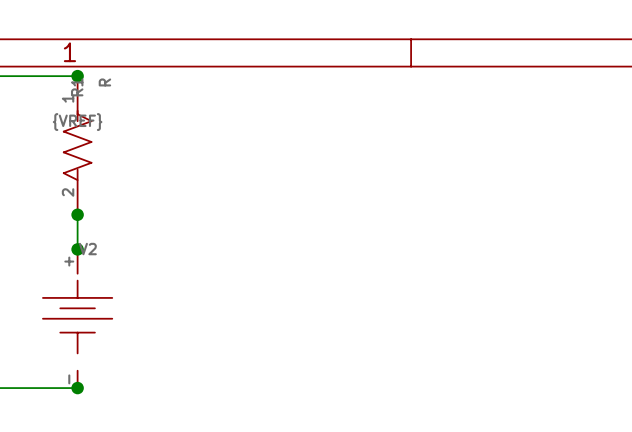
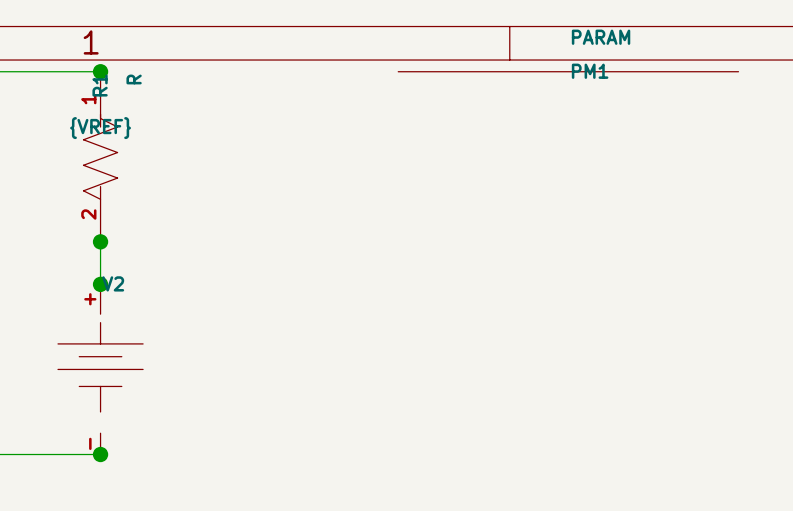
PM1: none -> PARAM (568, 71)

